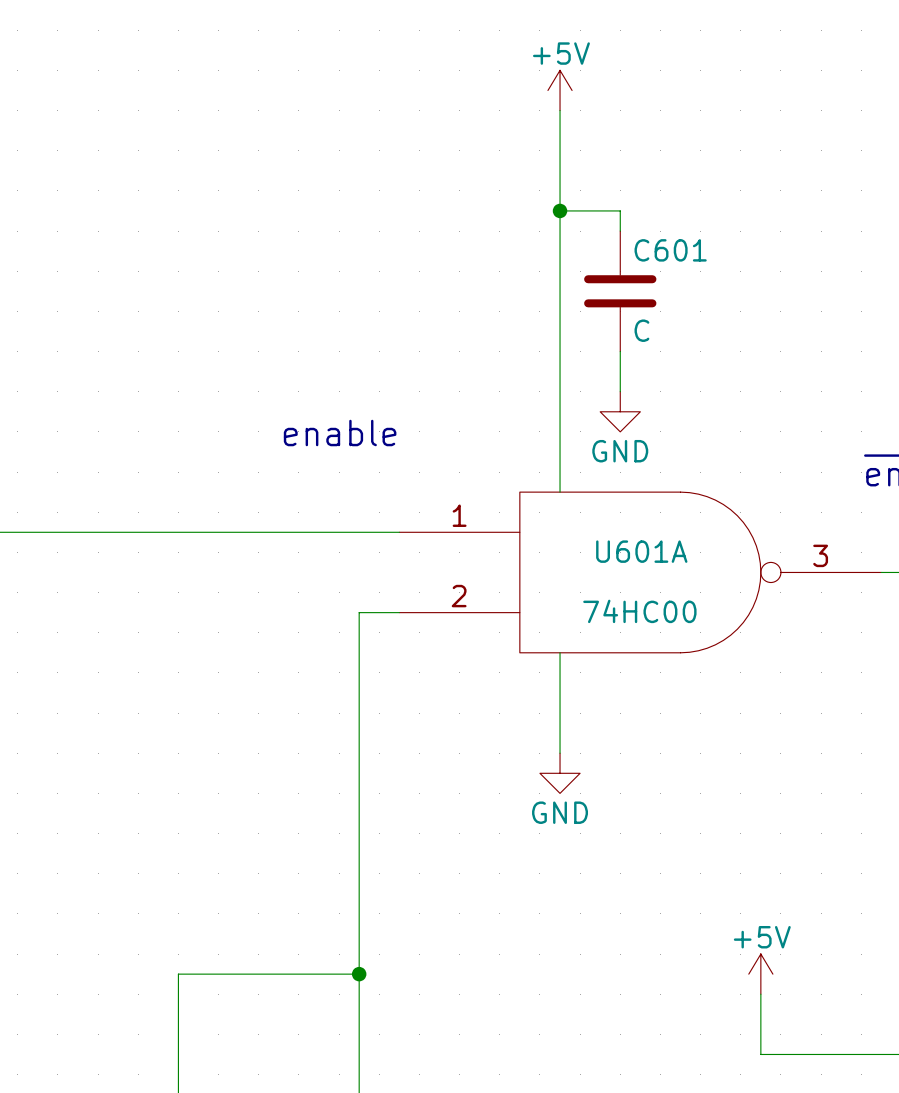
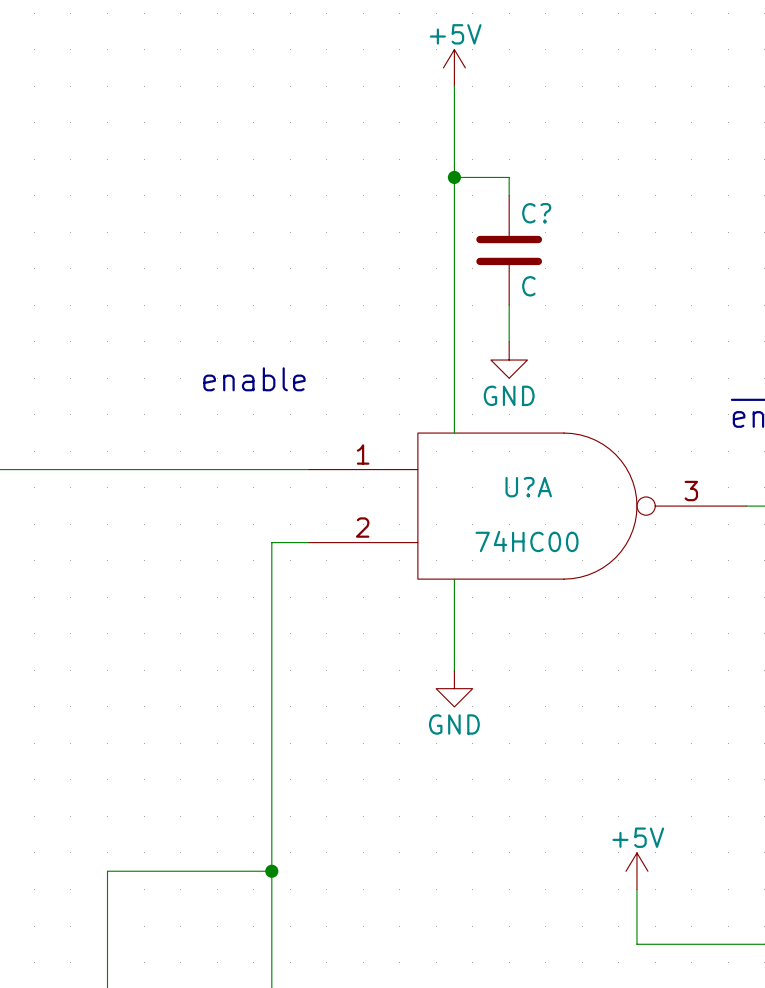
C601 name: C601 (670, 250) -> C? (536, 213)
U601A name: U601A (641, 551) -> U?A (528, 487)

